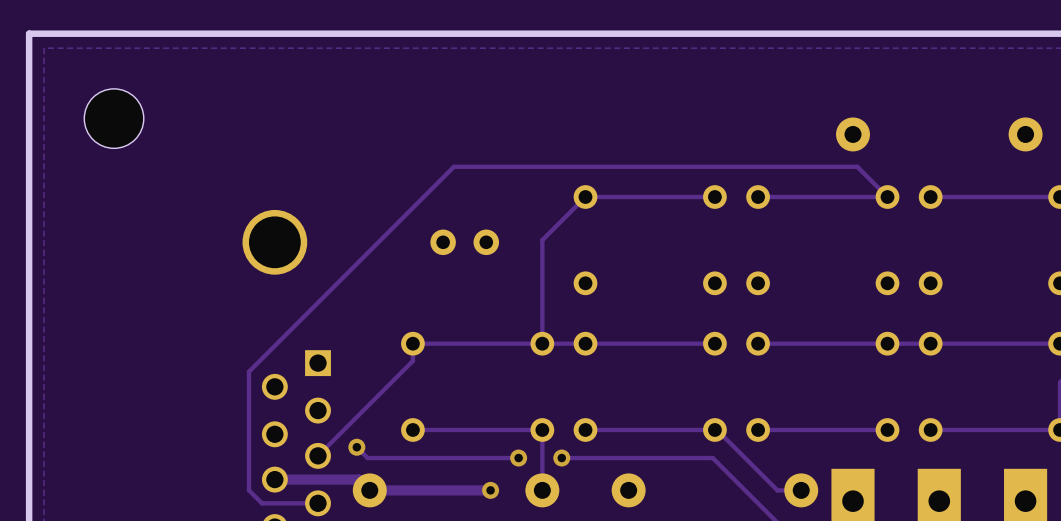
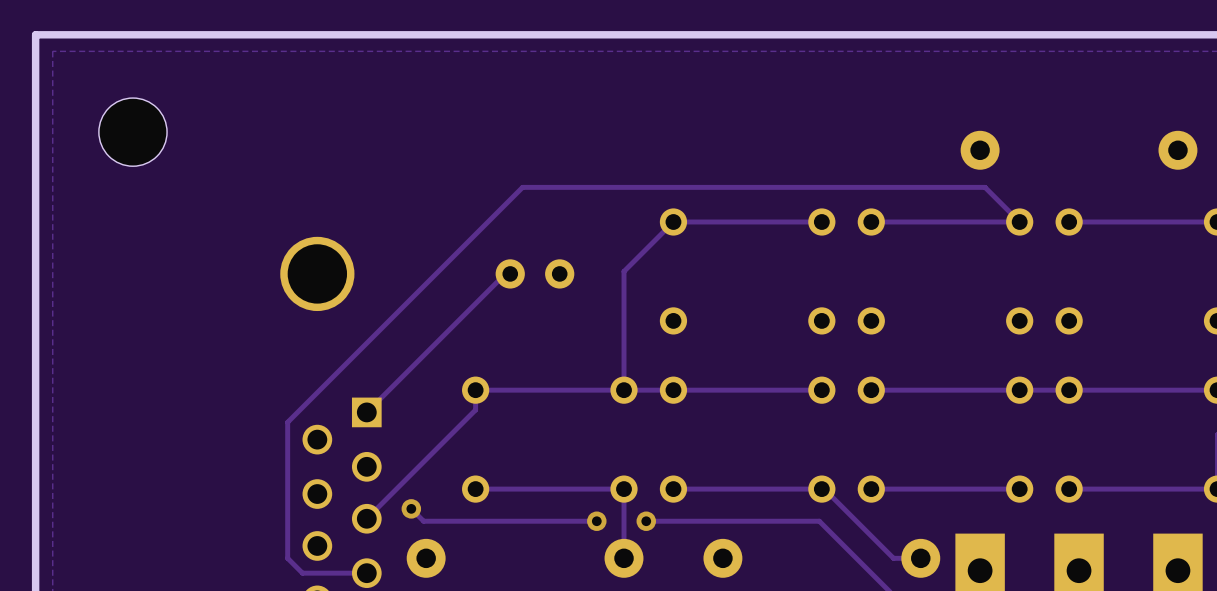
track: none -> (505, 273) (366, 412)
track: (274, 479) (359, 479) (369, 490) (490, 490) -> none
via: (490, 490) -> none

